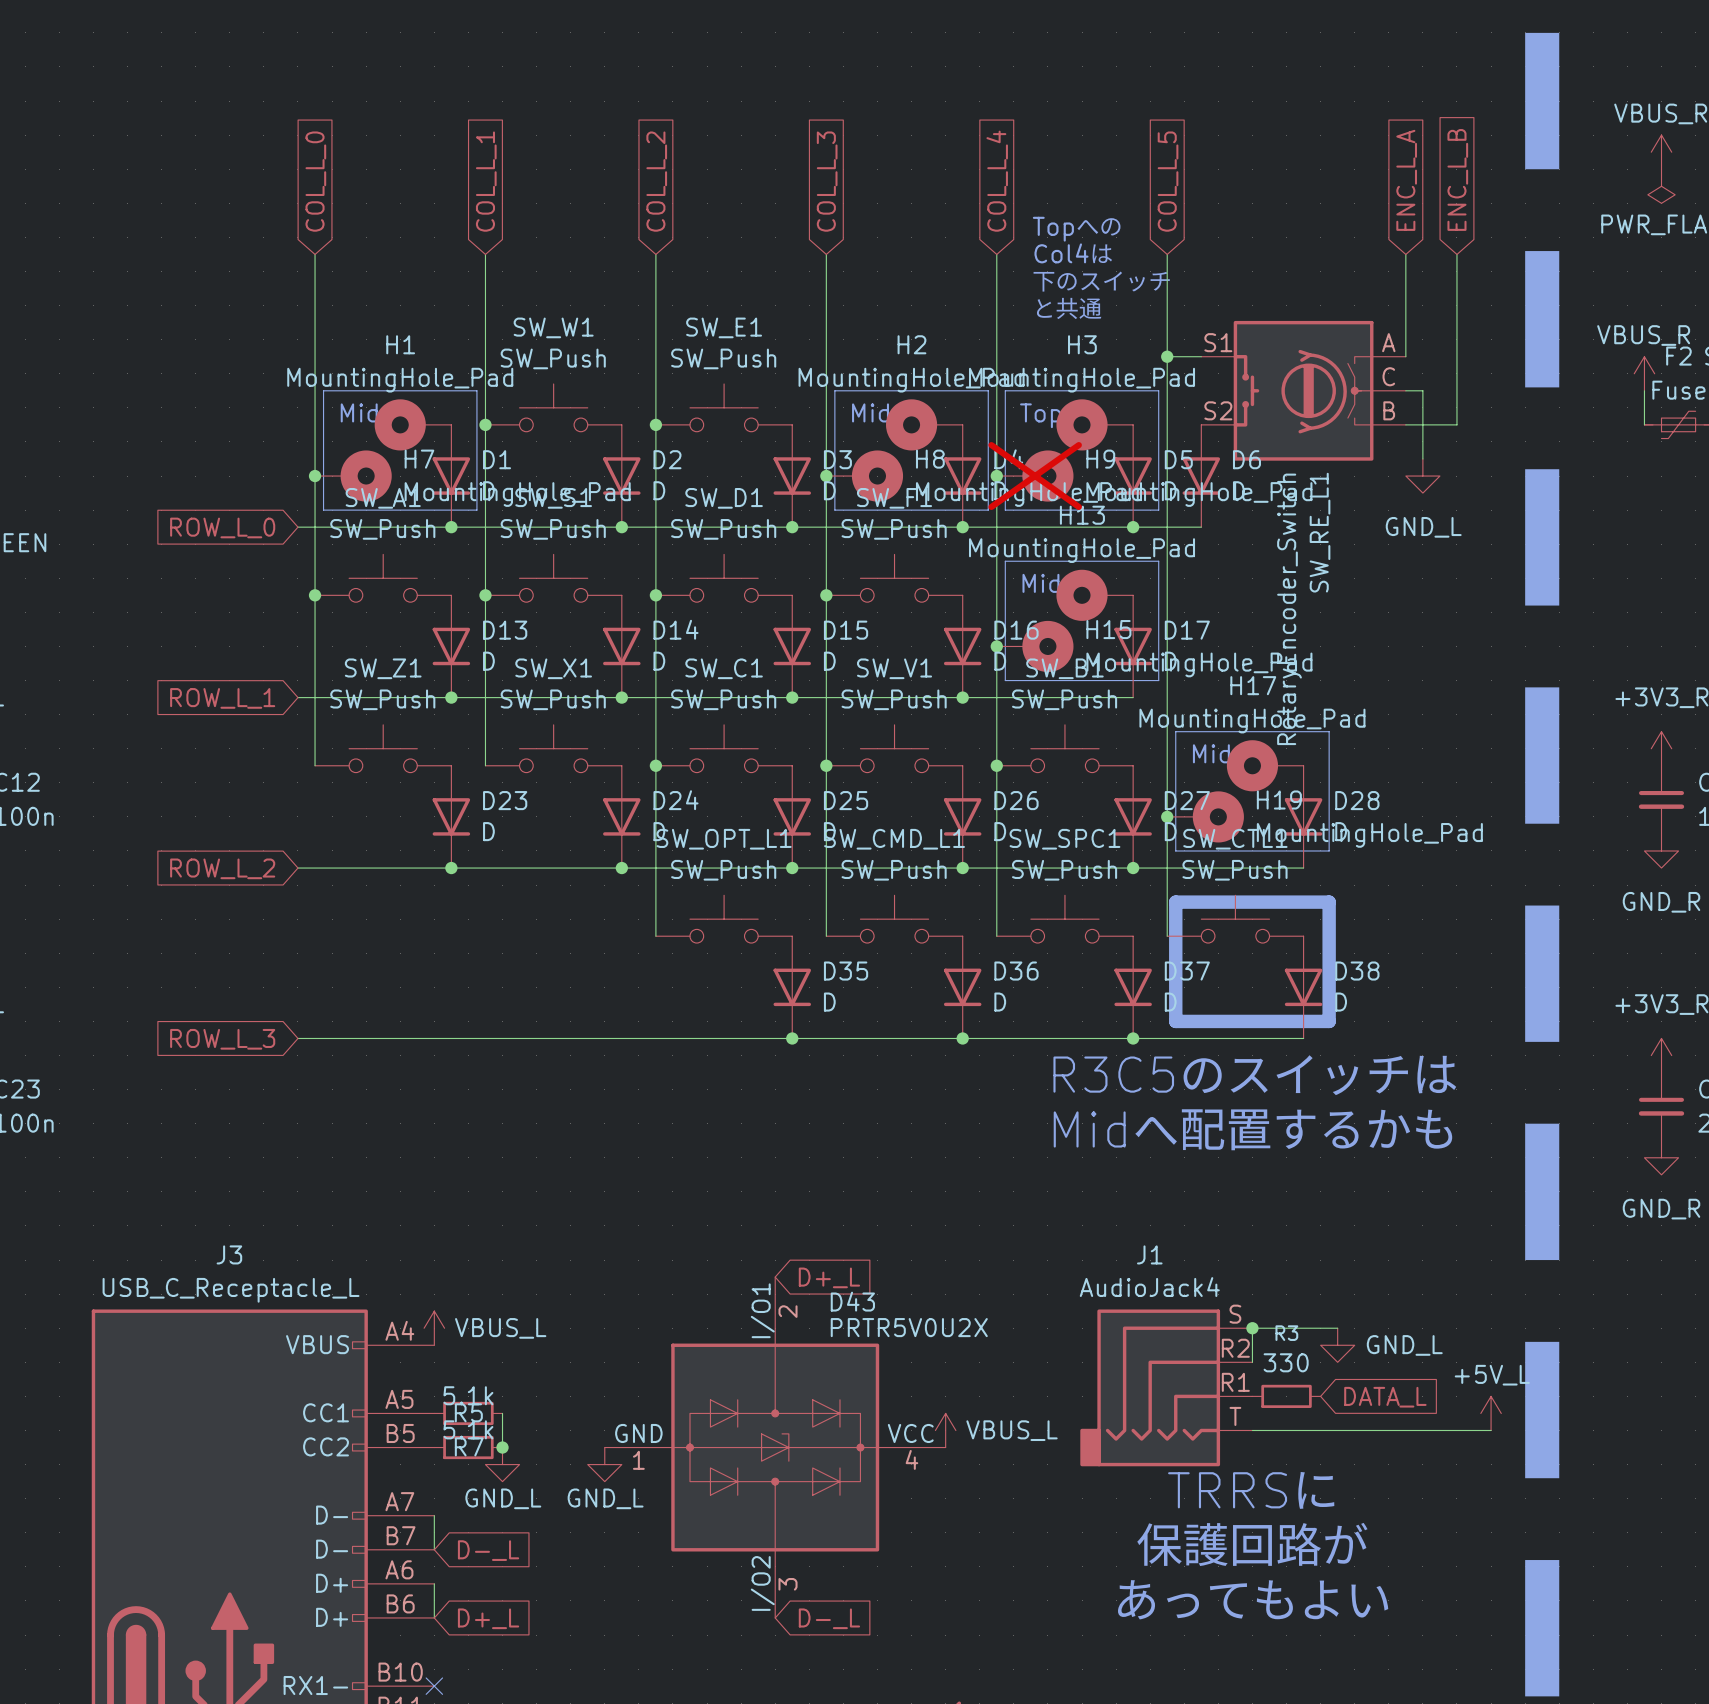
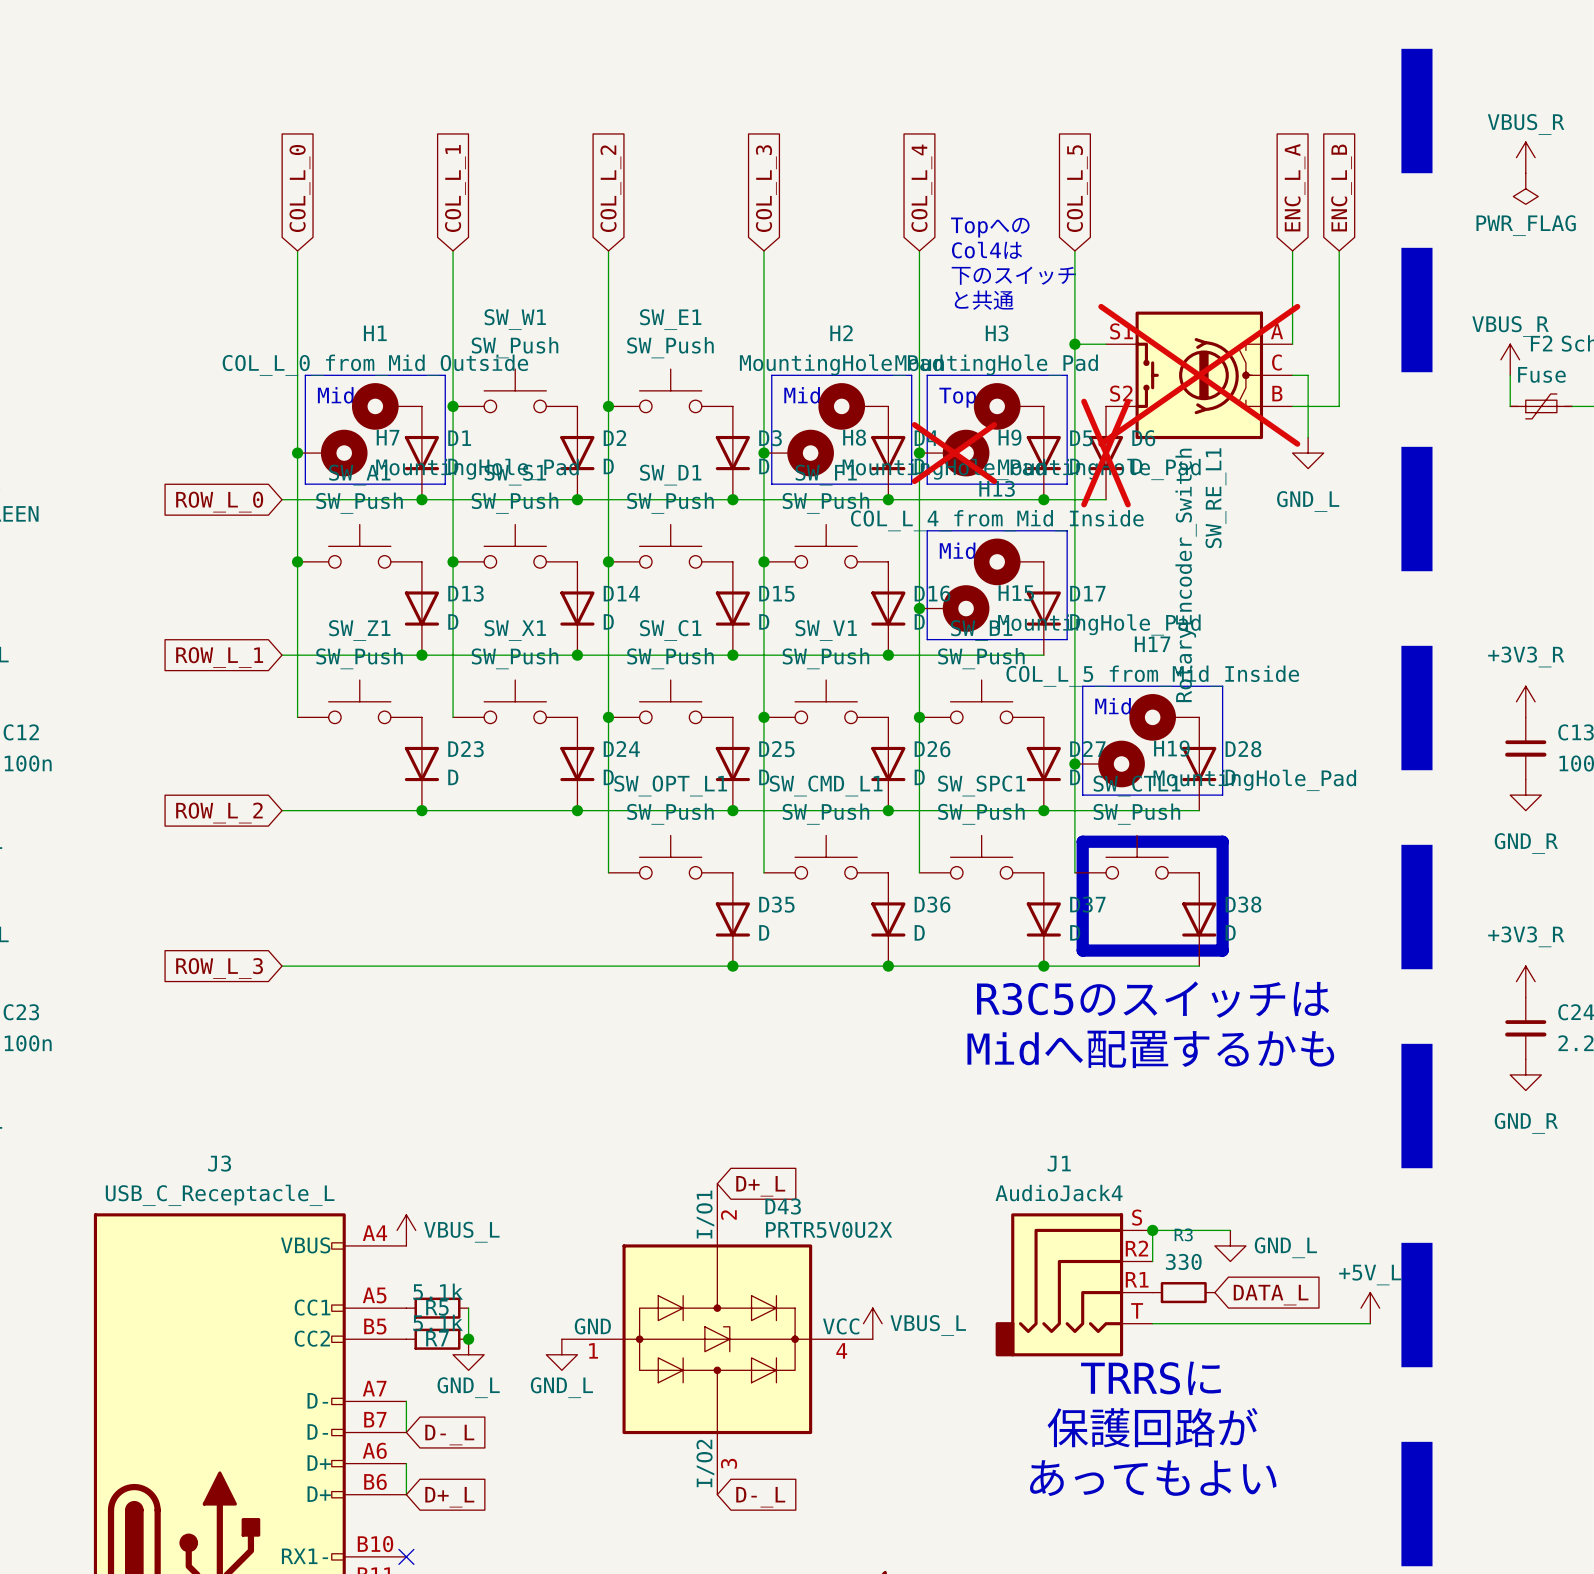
H1 value: MountingHole_Pad (400, 380) -> COL_L_0_from_Mid_Outside (375, 365)
SW_RE_L1 do-not-place cross: none -> (1199, 375)
D6 do-not-place cross: none -> (1106, 453)
H13 value: MountingHole_Pad (1082, 550) -> COL_L_4_from_Mid_Inside (997, 520)
H17 value: MountingHole_Pad (1252, 721) -> COL_L_5_from_Mid_Inside (1152, 676)

